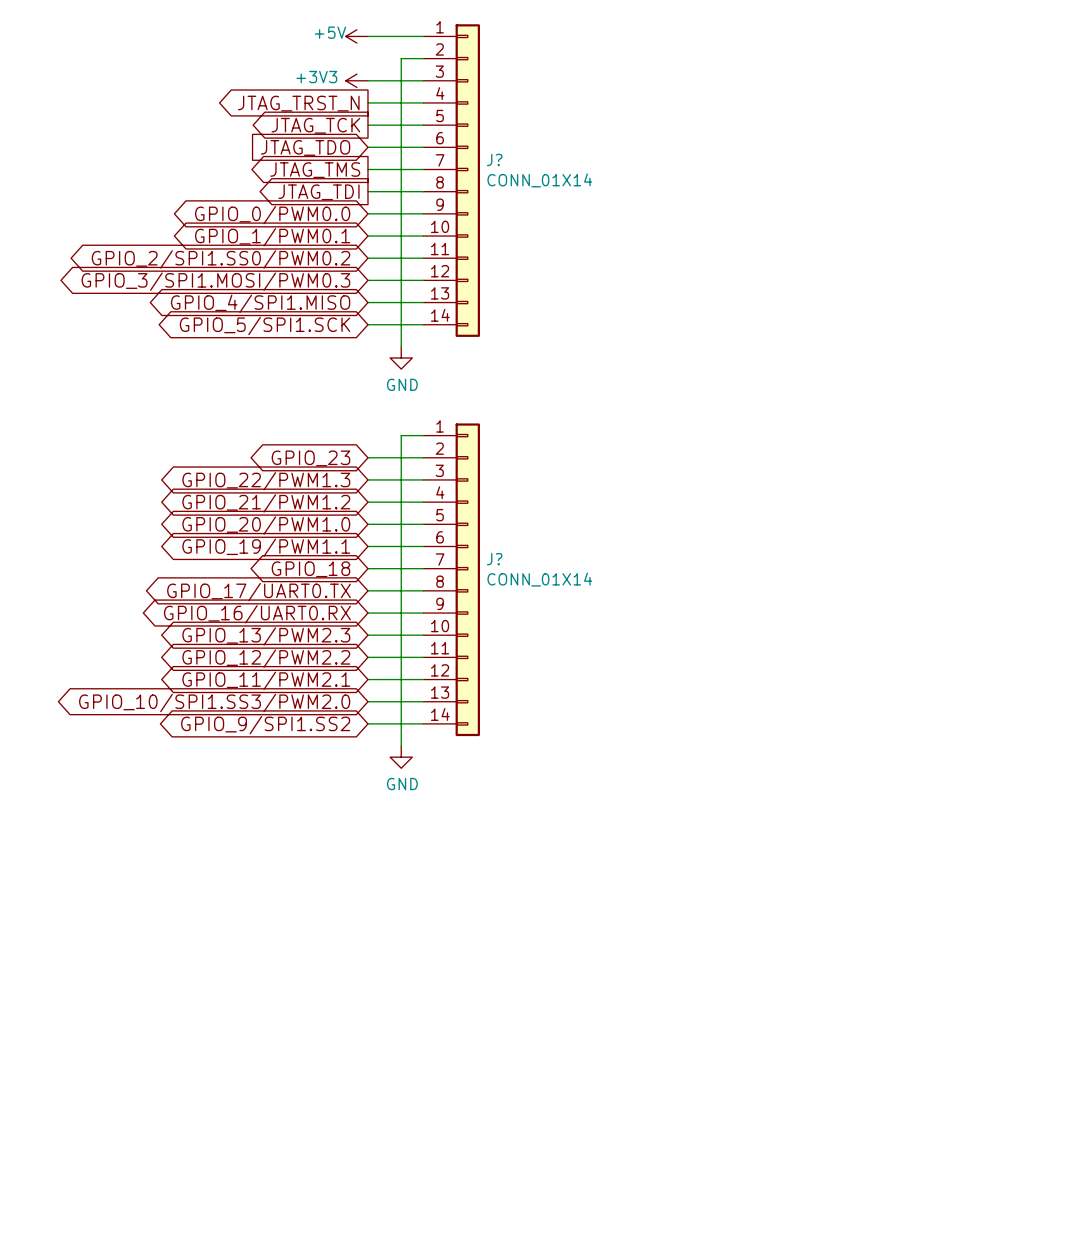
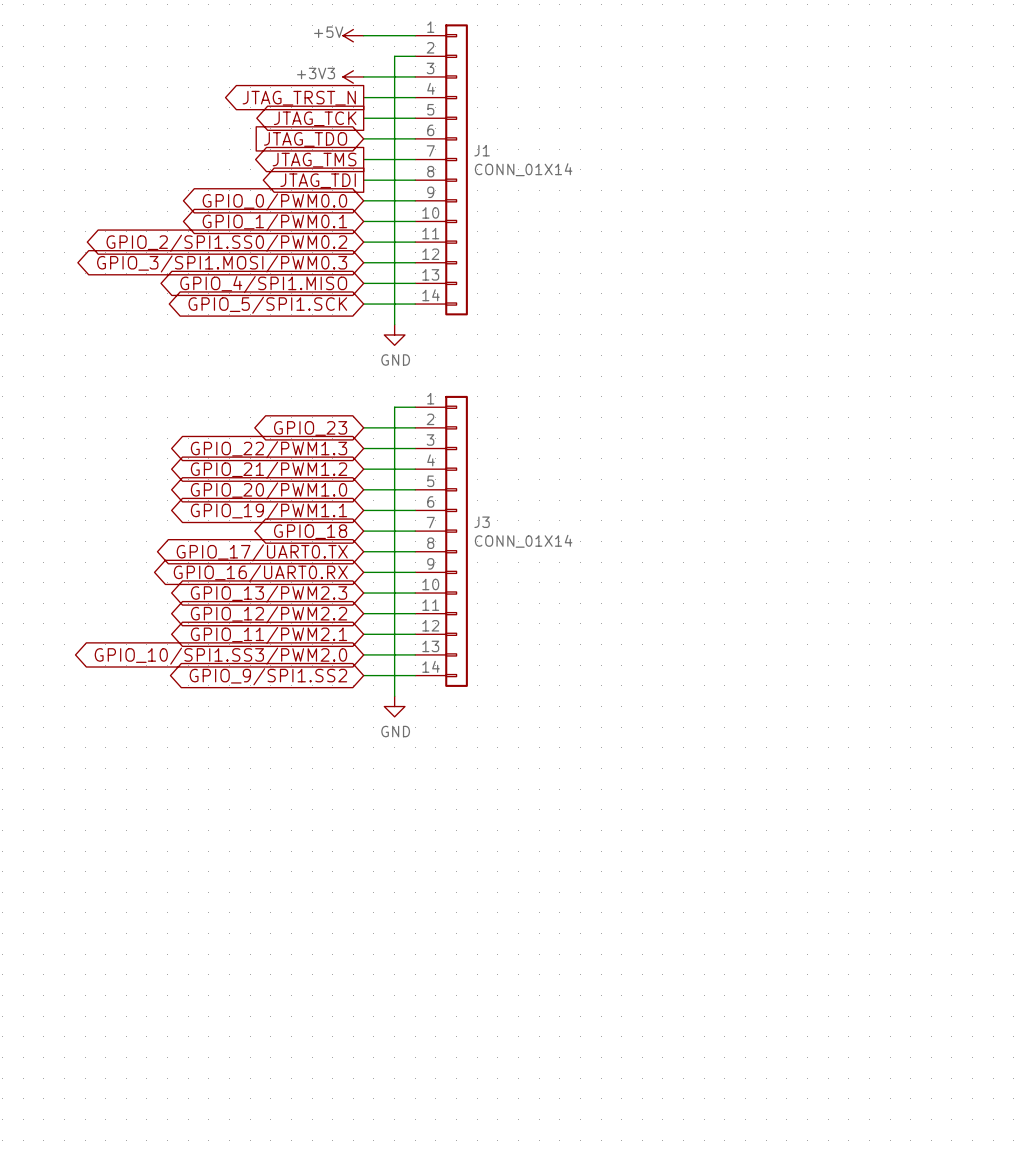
J? name: J? (494, 159) -> J1 (482, 150)
J? name: J? (494, 559) -> J3 (482, 522)

